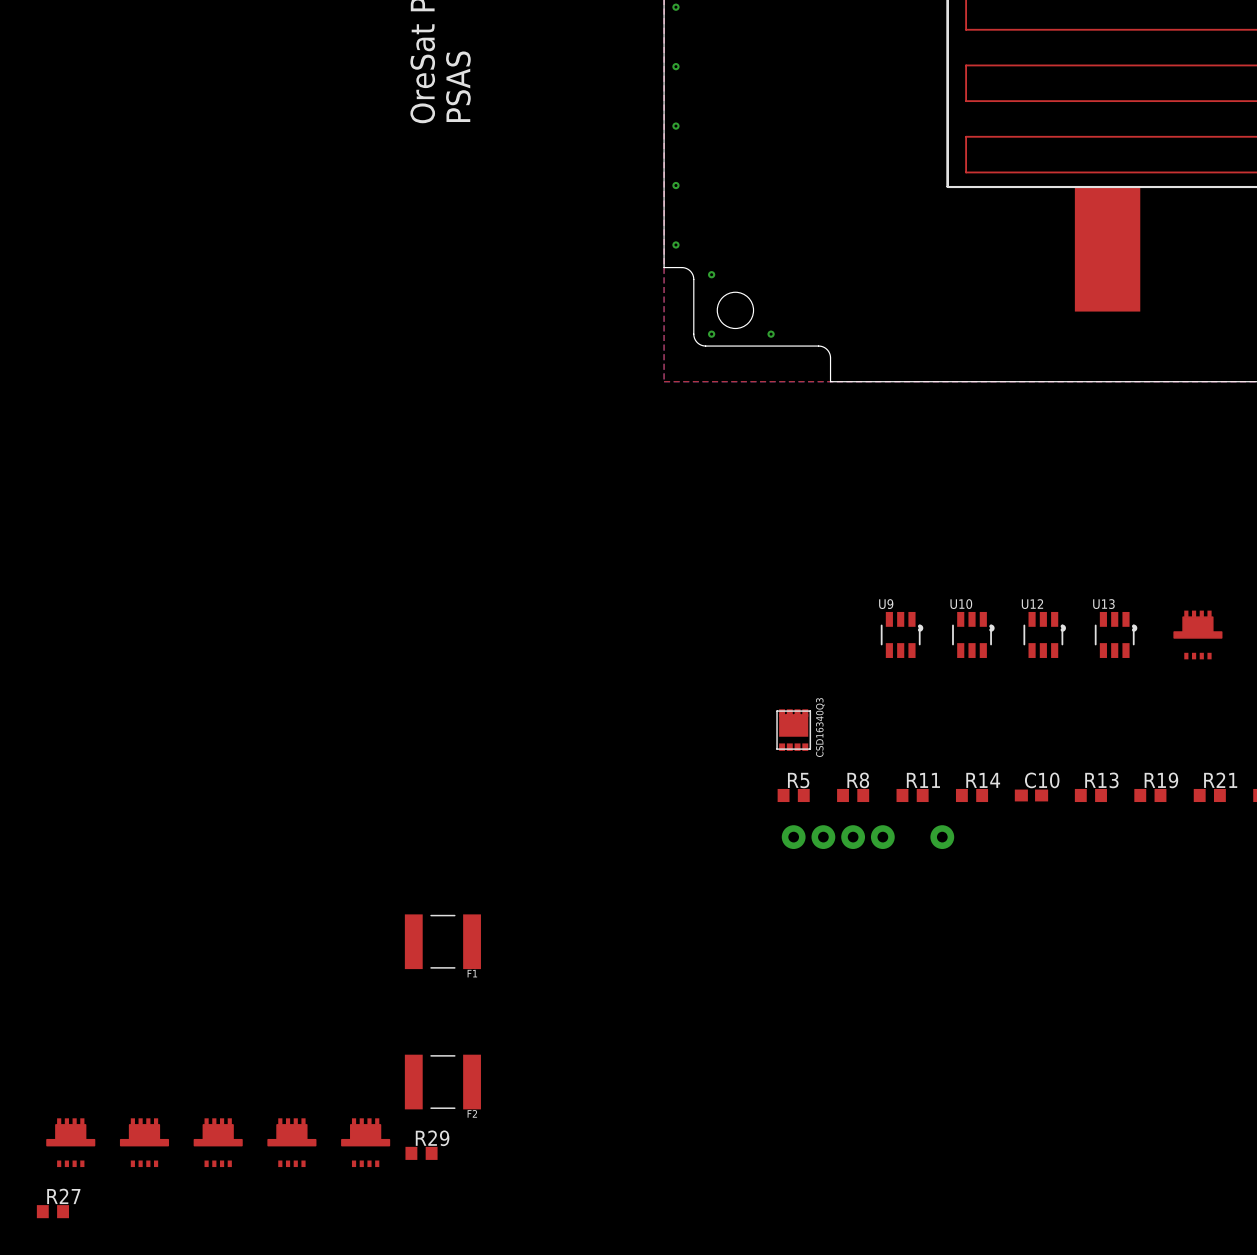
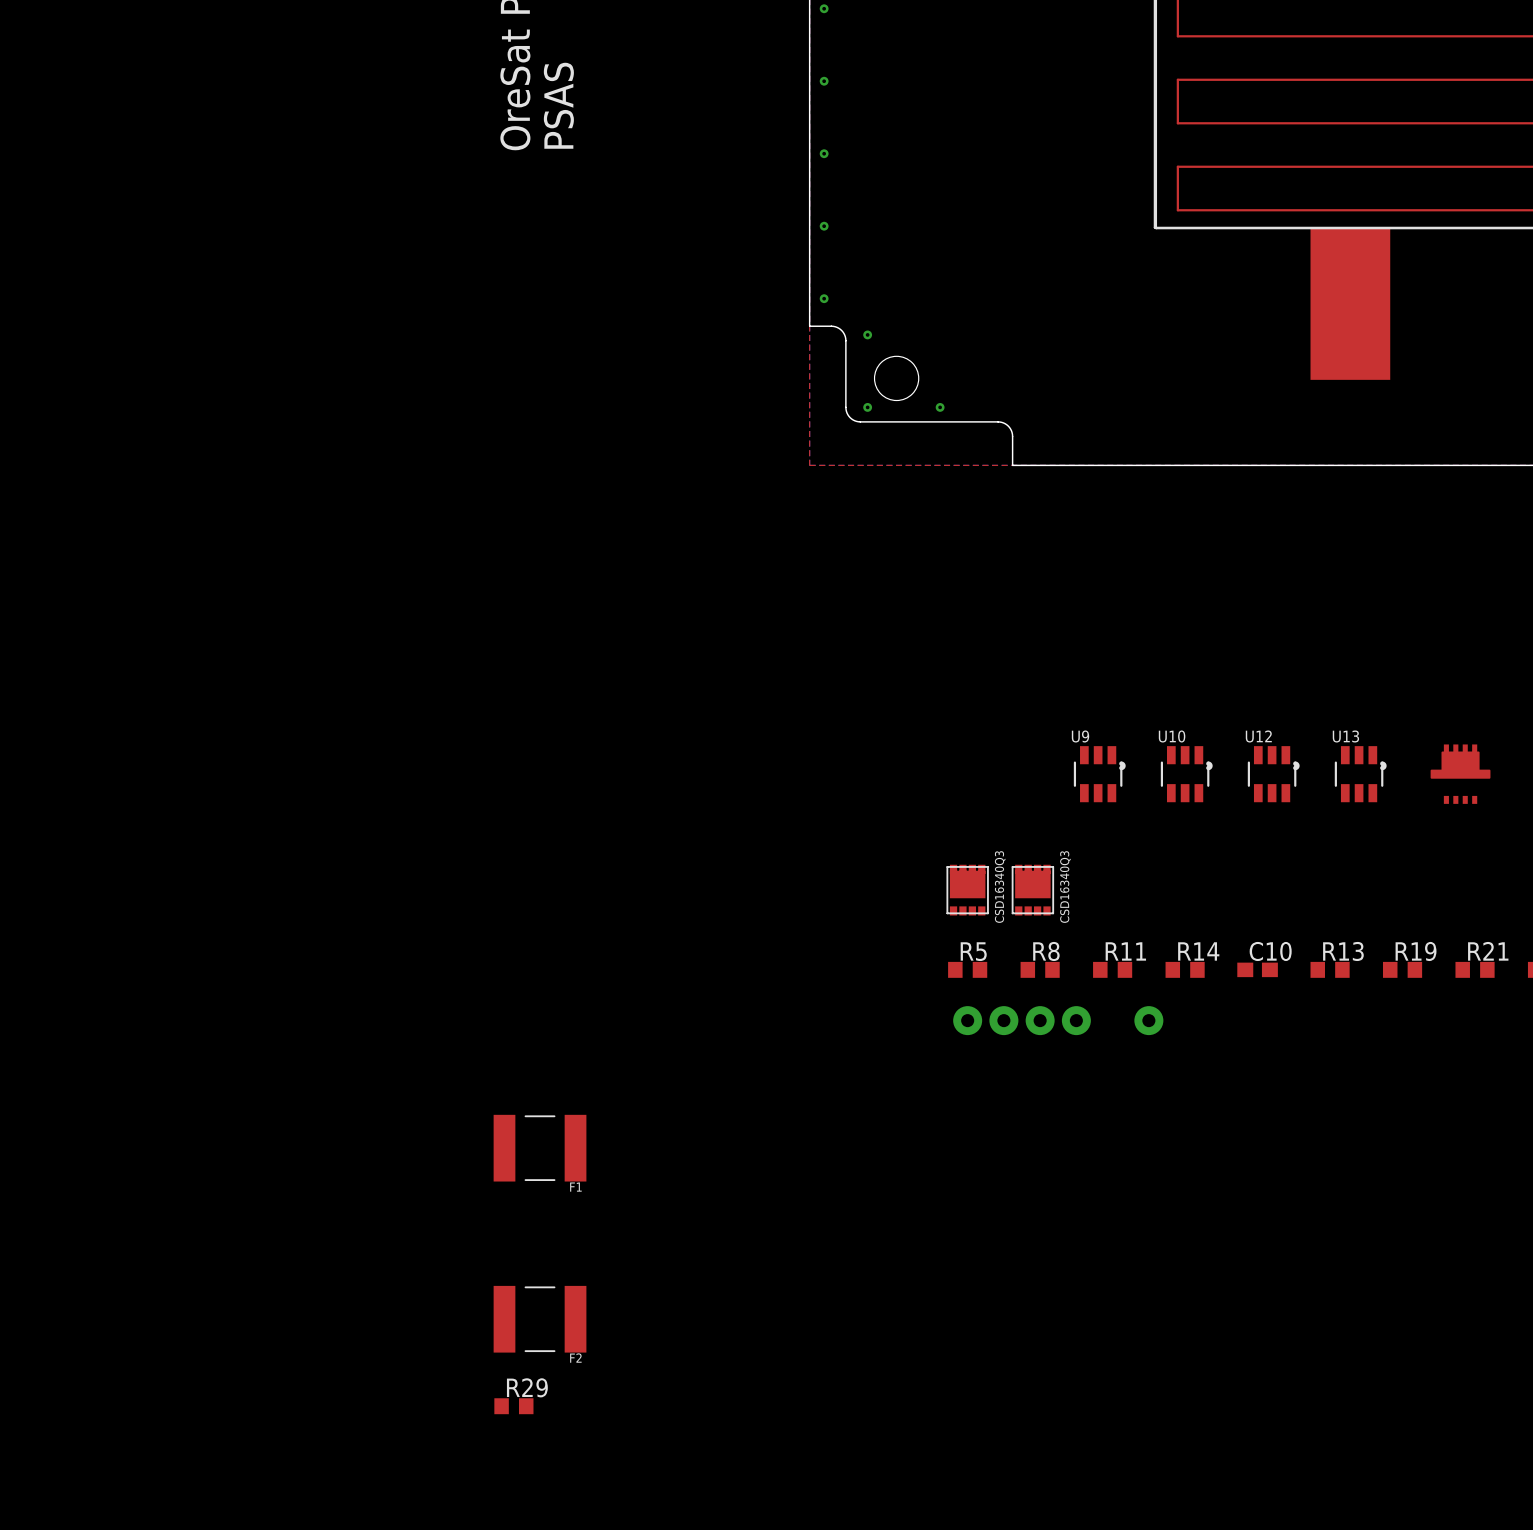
part: none -> (1032, 890)
part: (70, 1142) -> none
part: (144, 1142) -> none
part: (218, 1142) -> none
part: (291, 1142) -> none
part: (365, 1142) -> none
R27: (52, 1211) -> none

